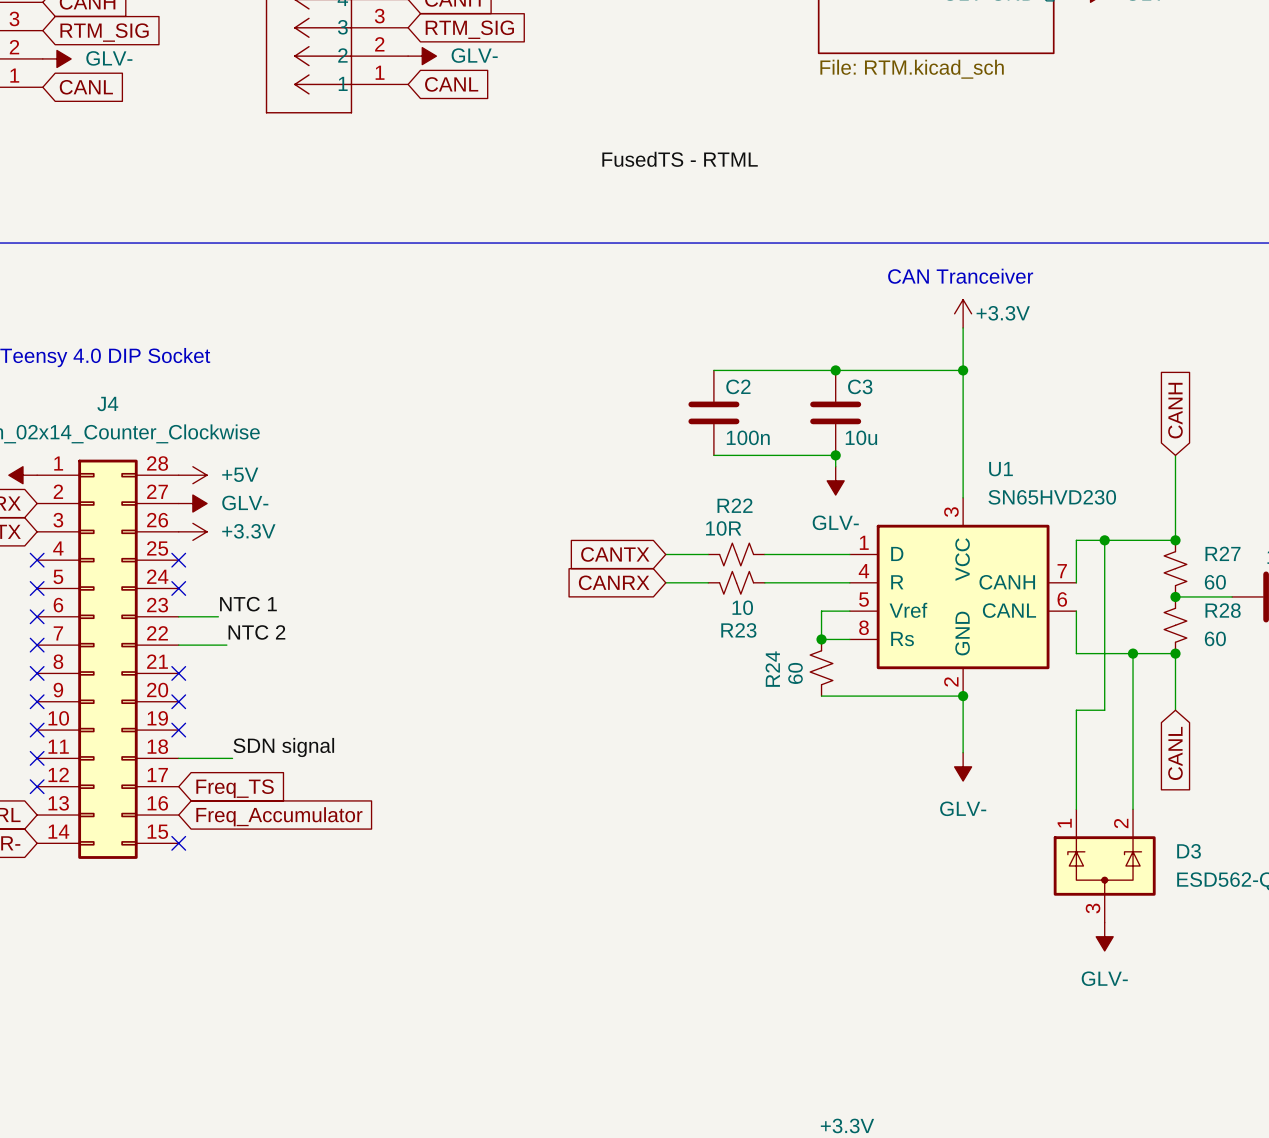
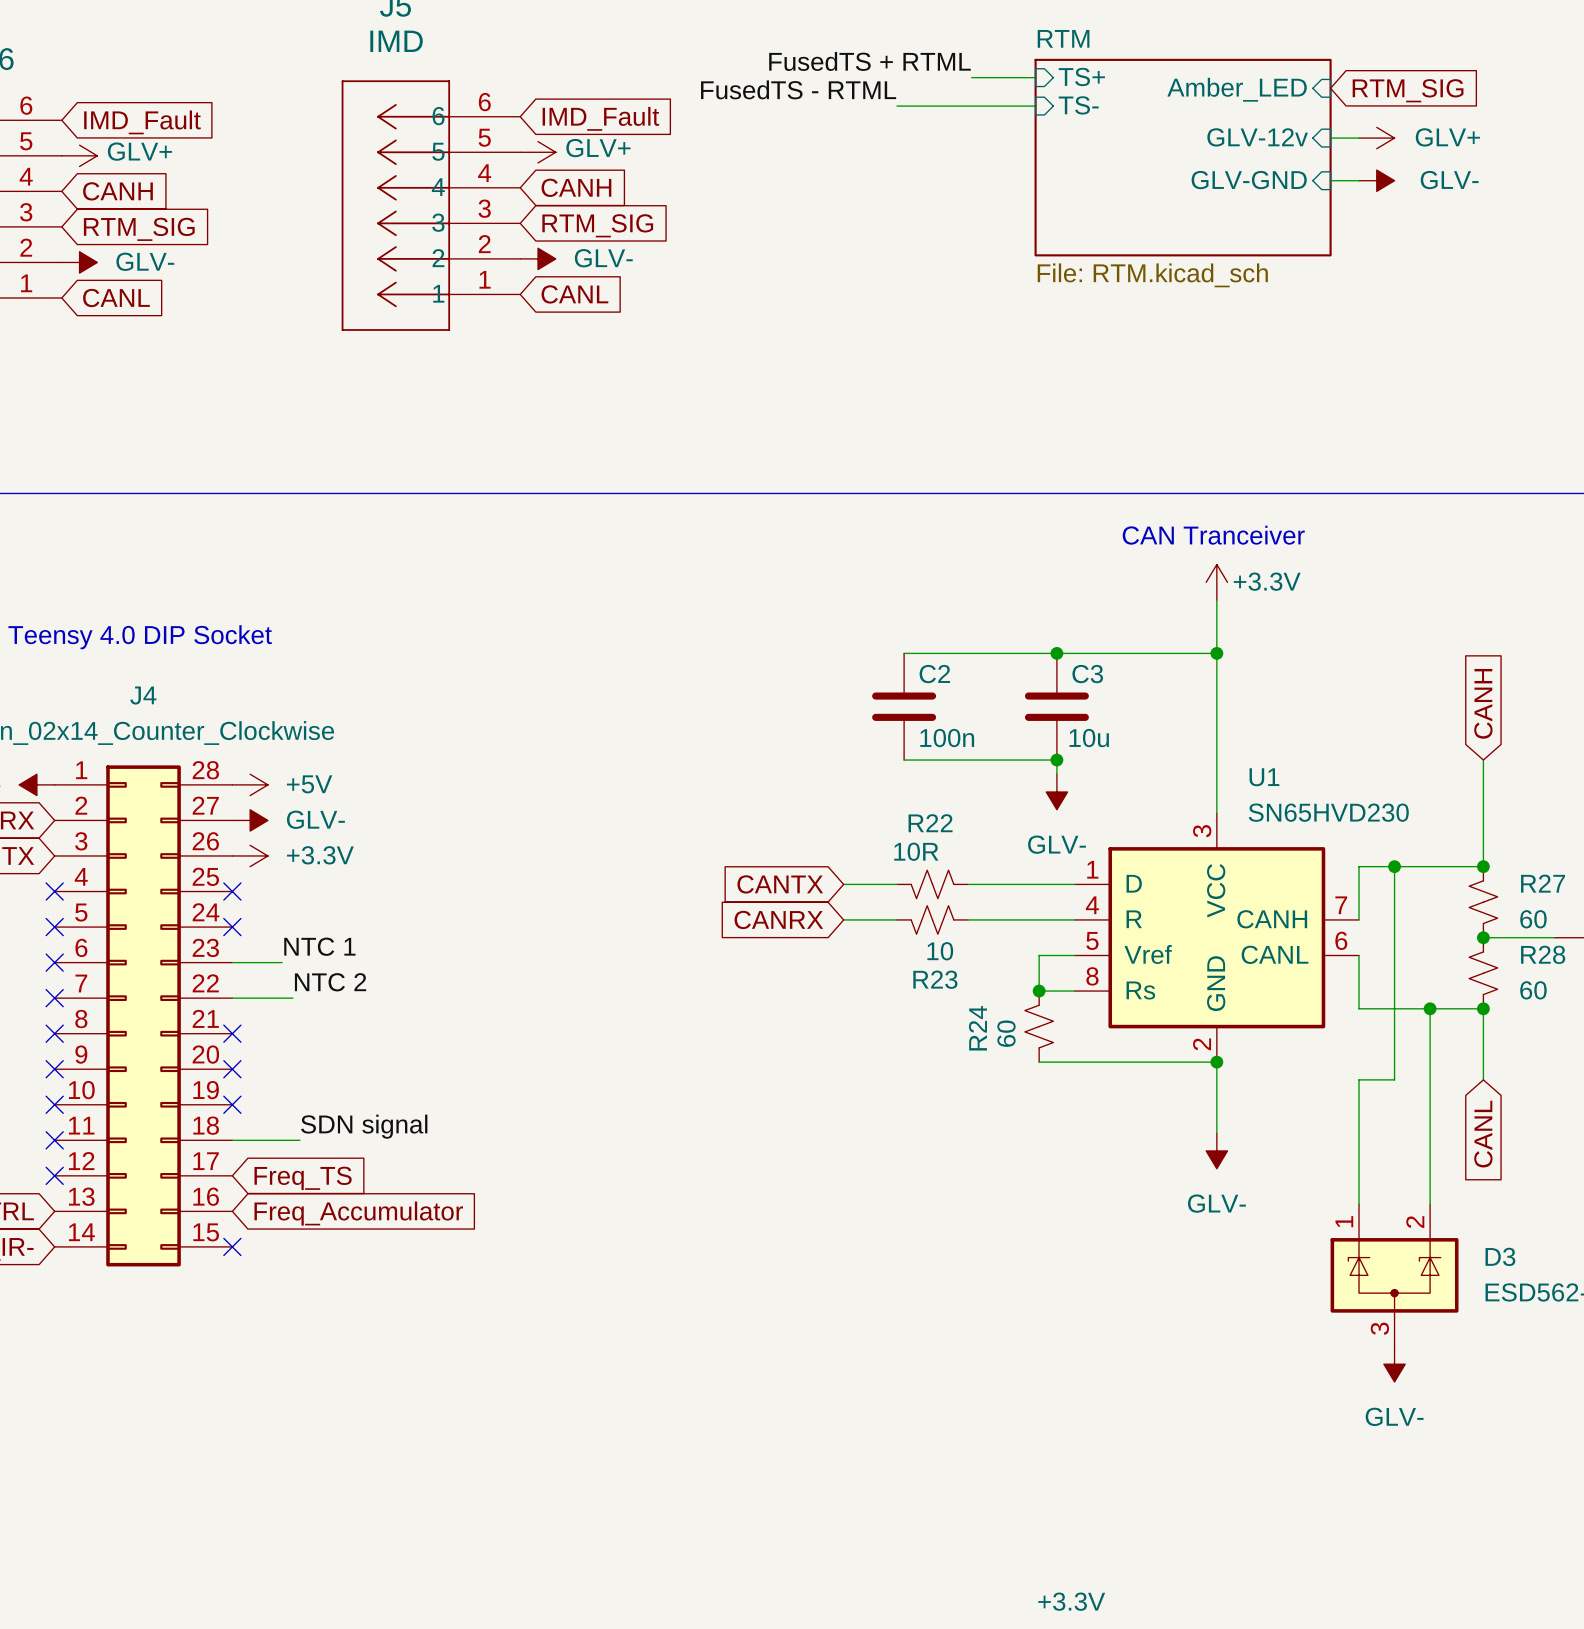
label: FusedTS - RTML (680, 159) -> none

